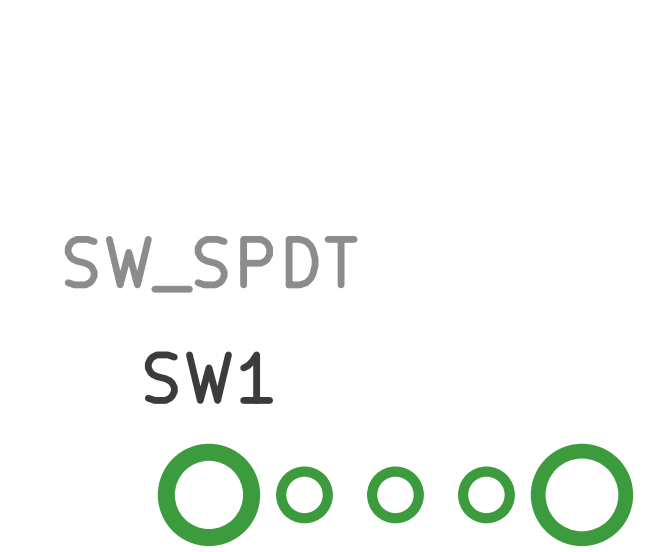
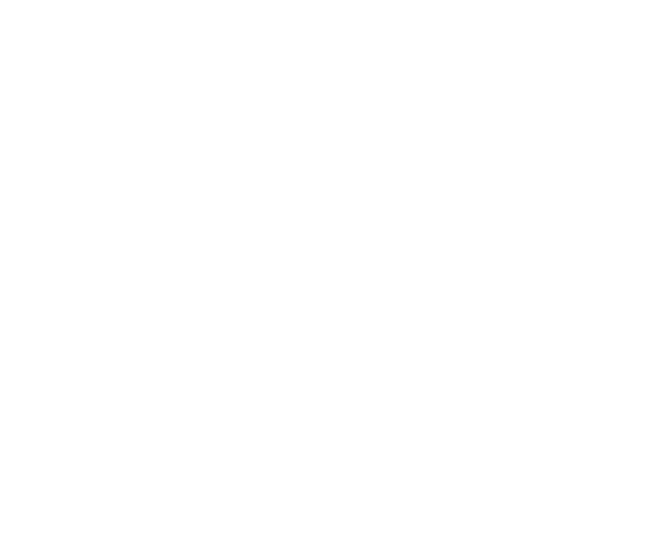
SW1: SW_SPDT (395, 494) -> none

